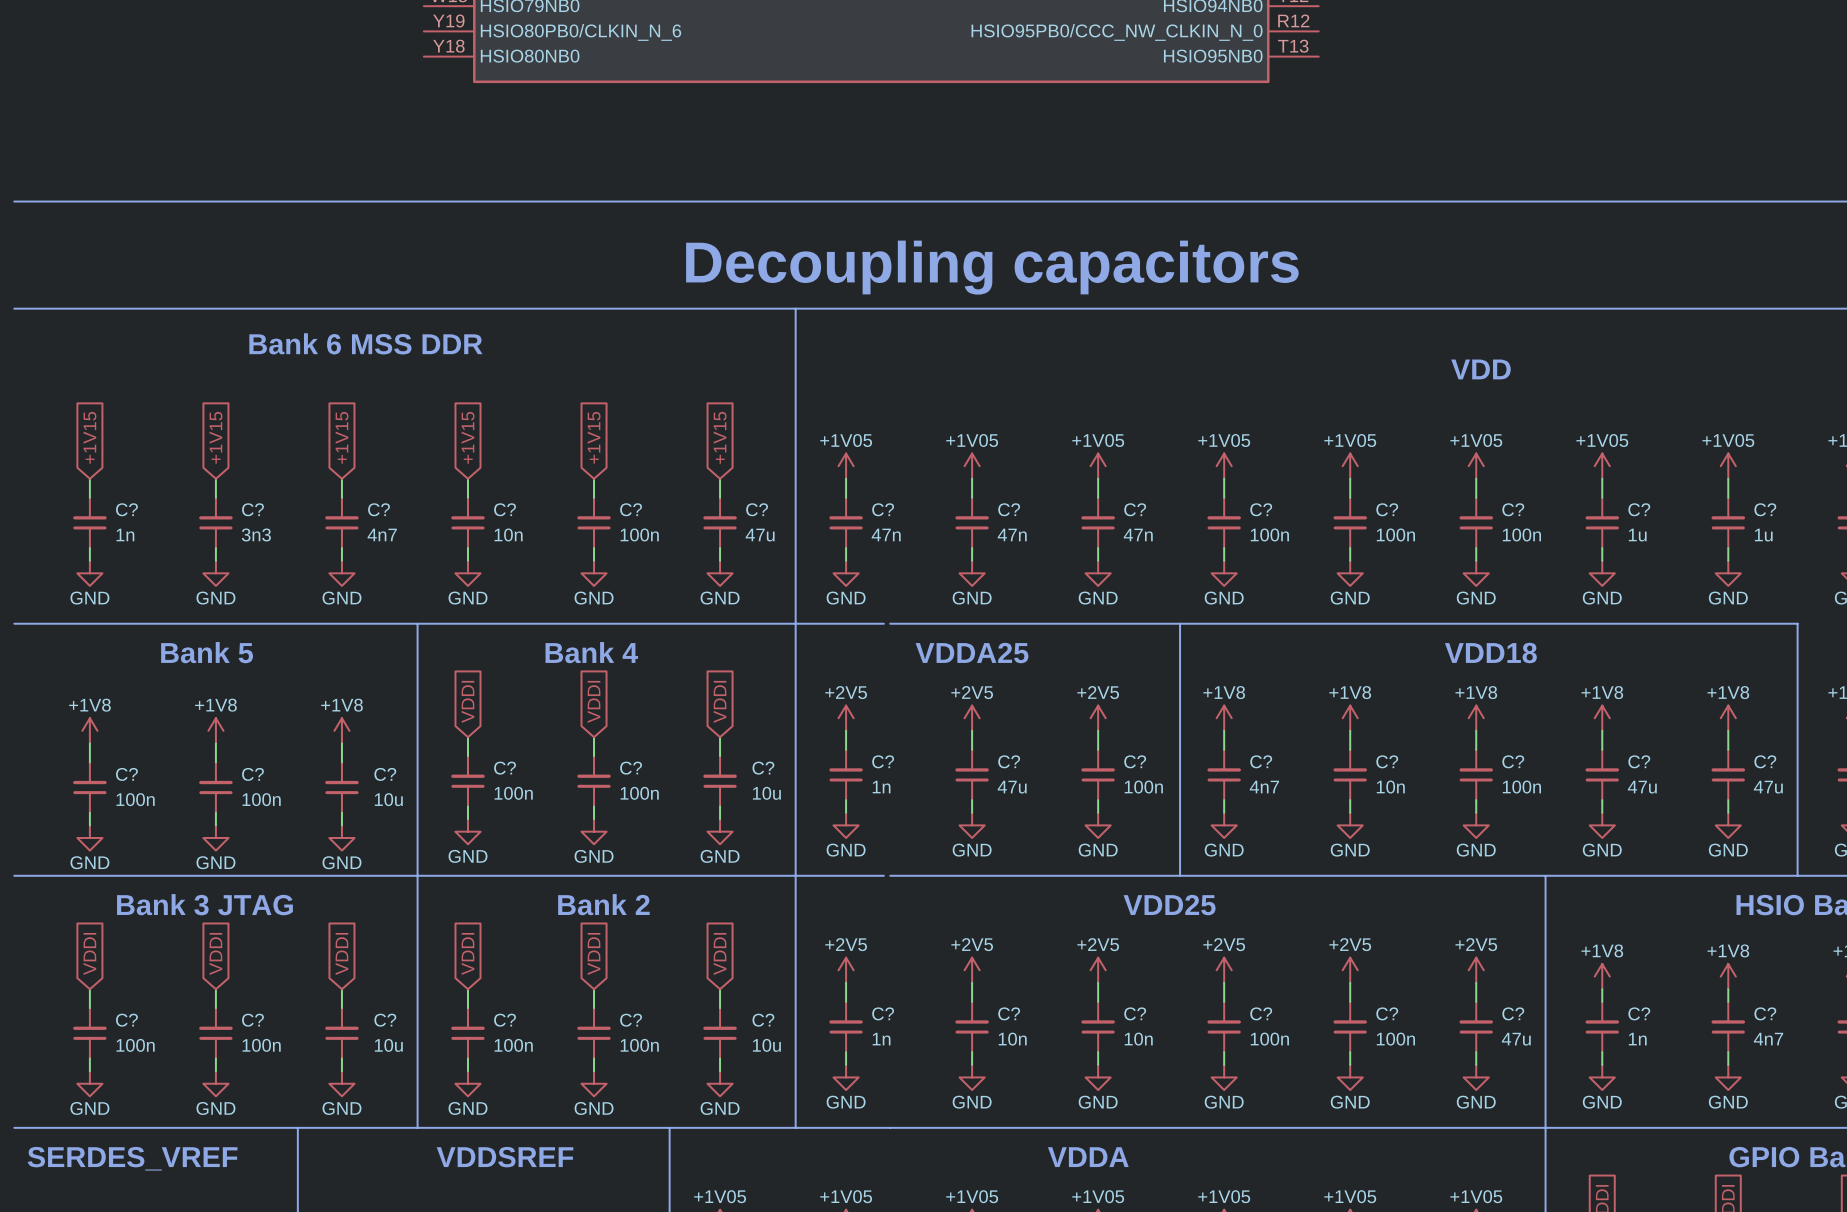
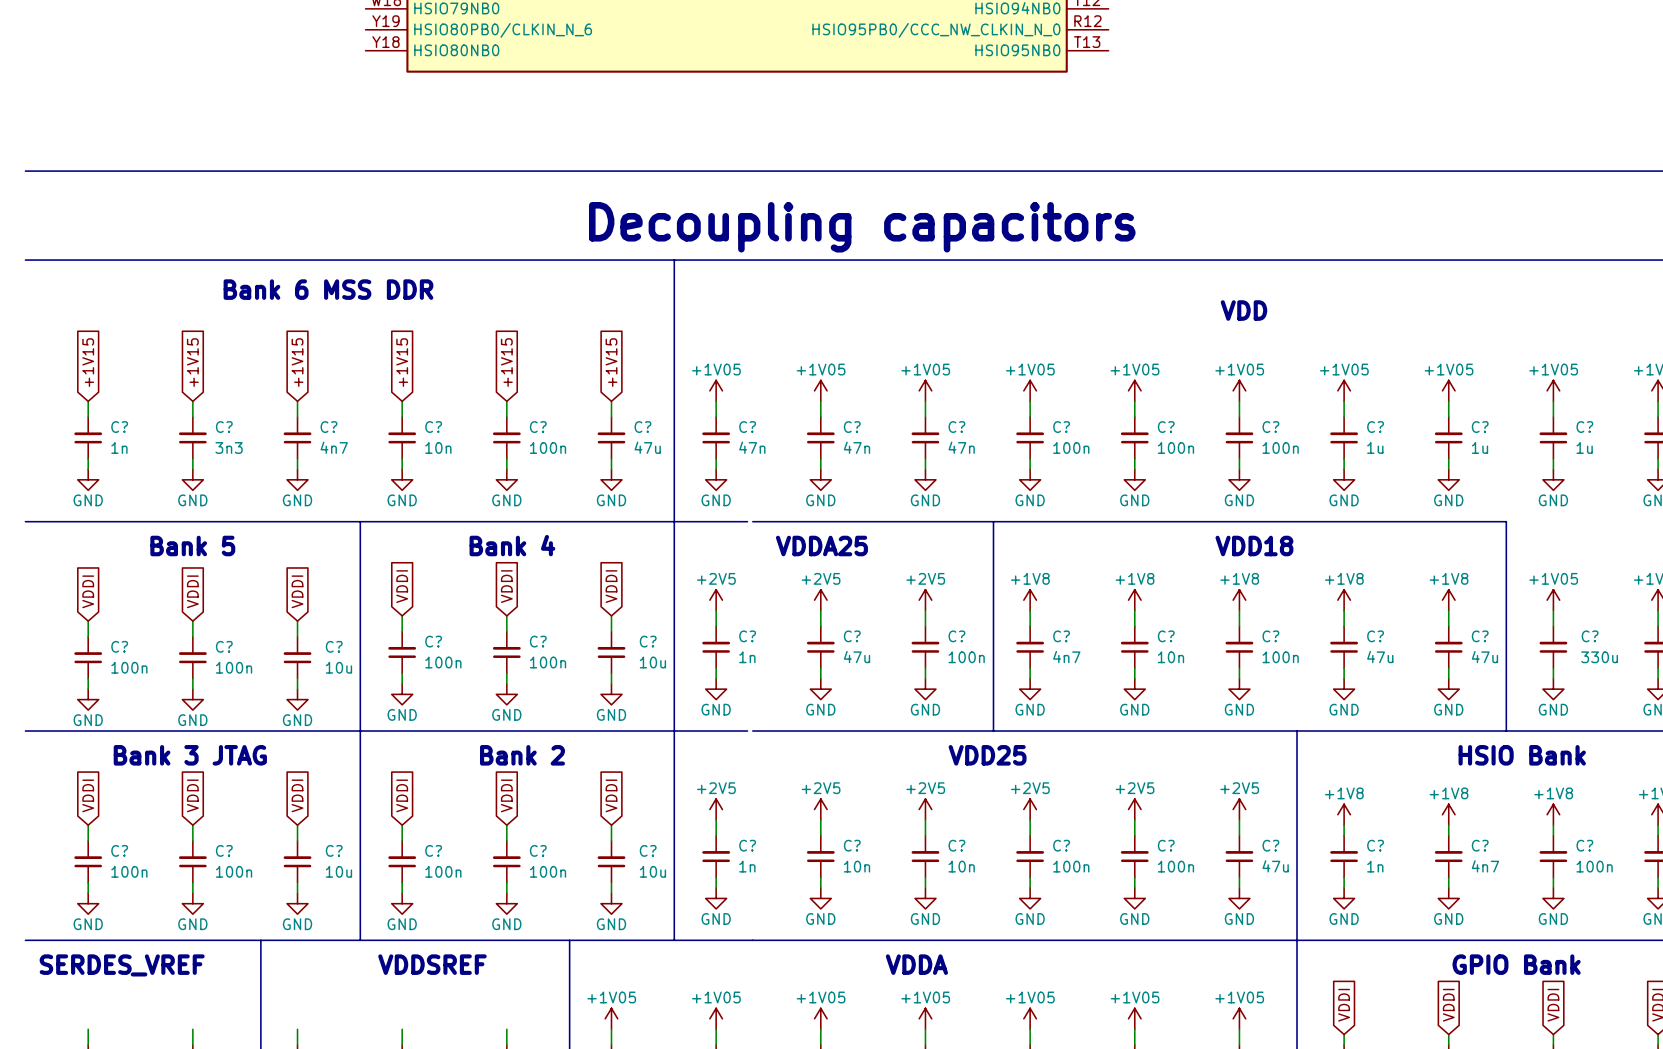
global label: none -> VDDI (88, 591)
global label: none -> VDDI (192, 591)
global label: none -> VDDI (297, 591)
power symbol: +1V8 (89, 730) -> none
power symbol: +1V8 (215, 730) -> none
power symbol: +1V8 (341, 730) -> none

